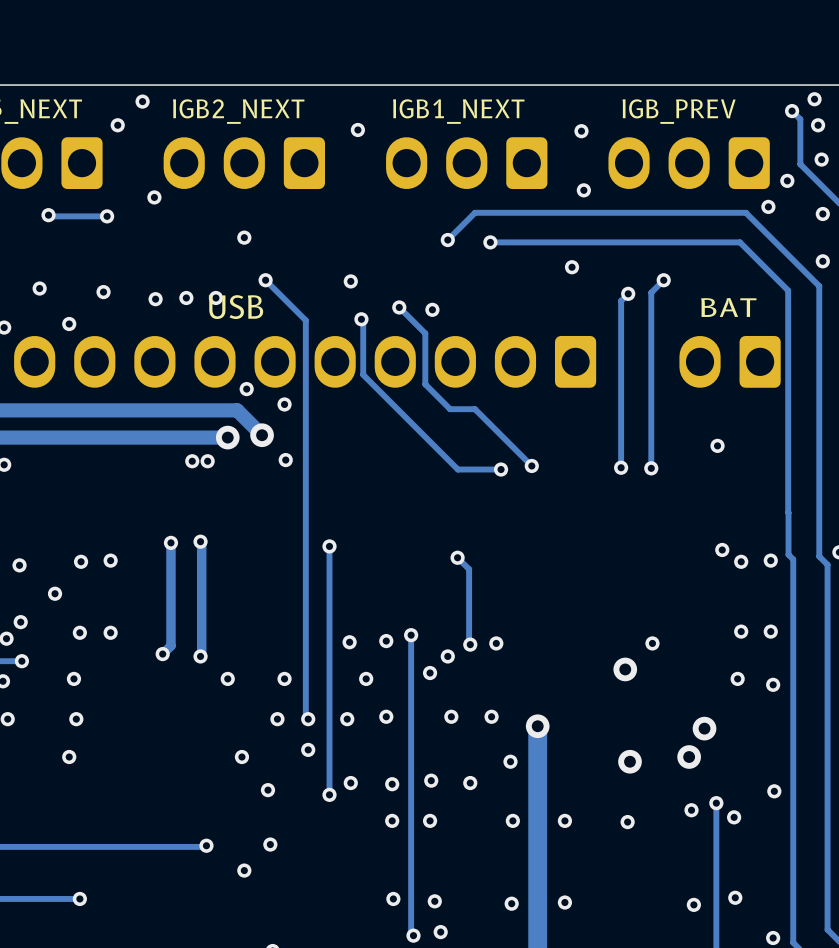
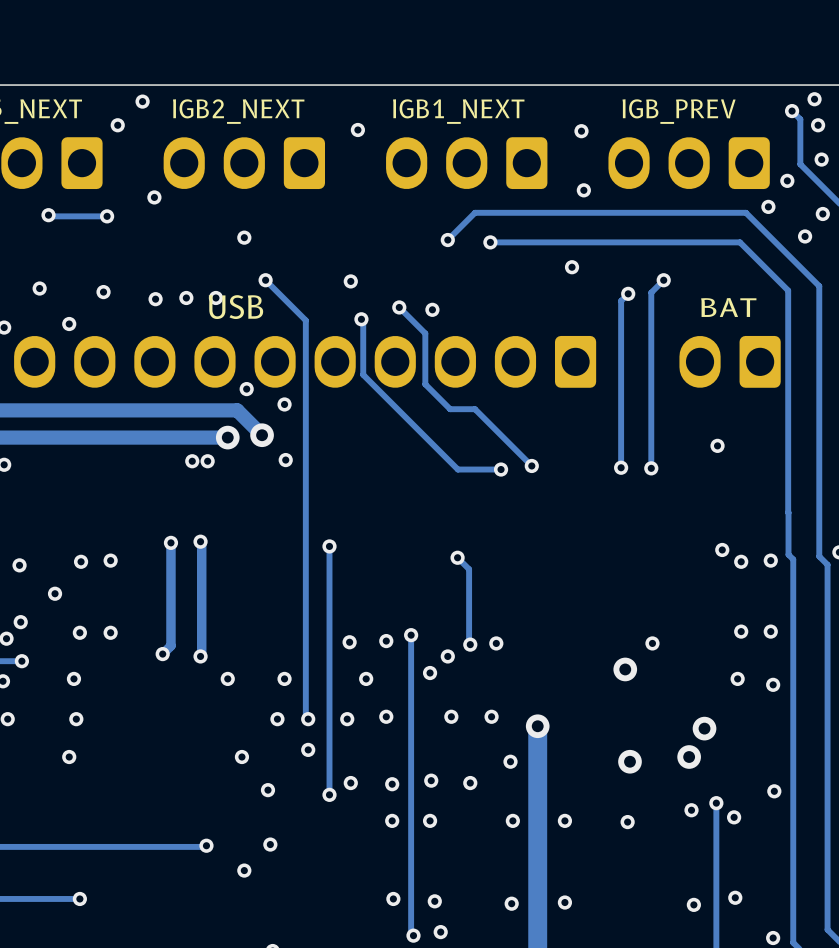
via: none -> (805, 236)
via: (822, 261) -> none

